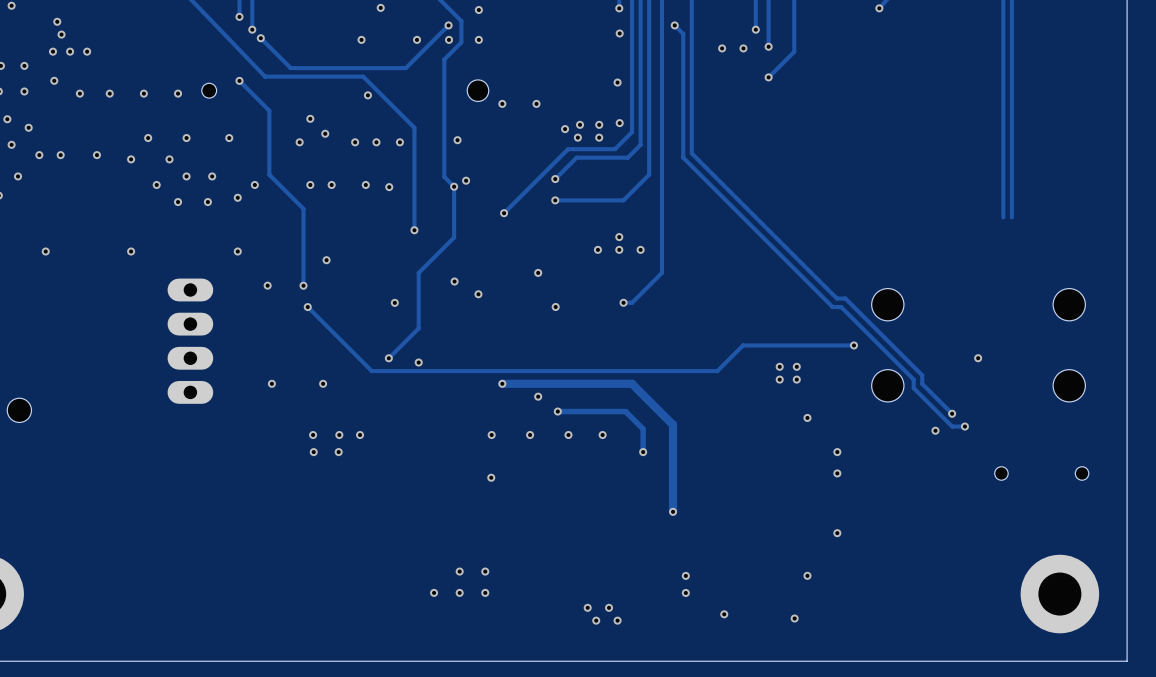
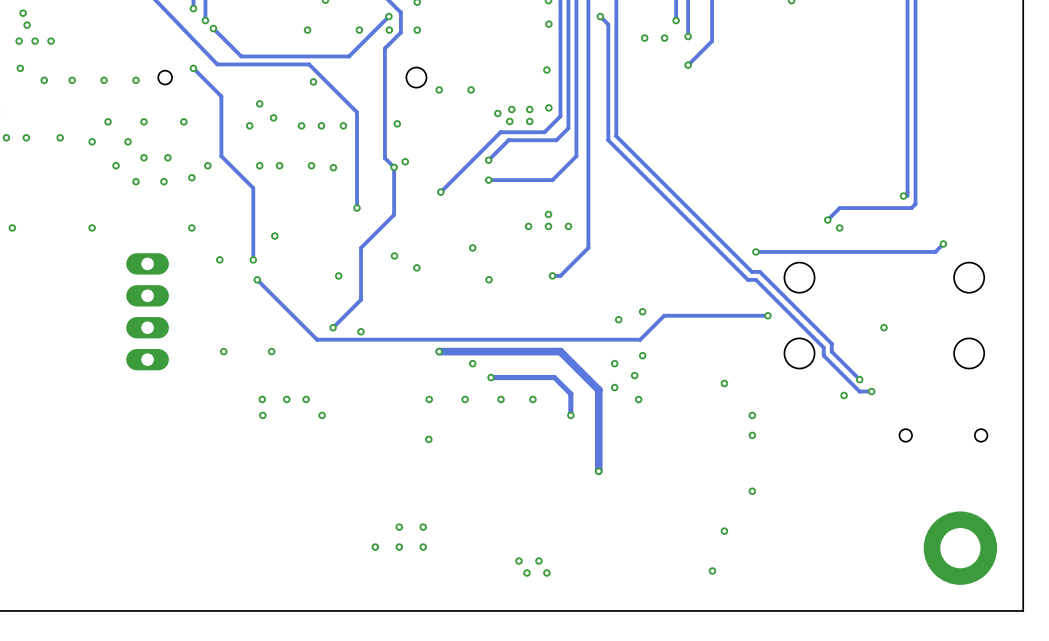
via: none -> (903, 196)
track: none -> (915, 196) (915, 204) (911, 208) (839, 208) (827, 220)
via: none -> (827, 220)
via: none -> (839, 228)
track: none -> (943, 243) (935, 251) (755, 251)
via: none -> (943, 243)
via: none -> (755, 251)
via: none -> (642, 311)
via: none -> (618, 319)
via: (779, 366) -> none
via: (796, 366) -> none
via: (779, 379) -> none
via: (796, 379) -> none
via: none -> (642, 355)
via: none -> (614, 363)
via: none -> (634, 375)
via: none -> (614, 387)
via: none -> (638, 399)
via position: (338, 452) -> (322, 415)
via: (685, 575) -> none
via: (685, 592) -> none
via: (724, 614) -> none

